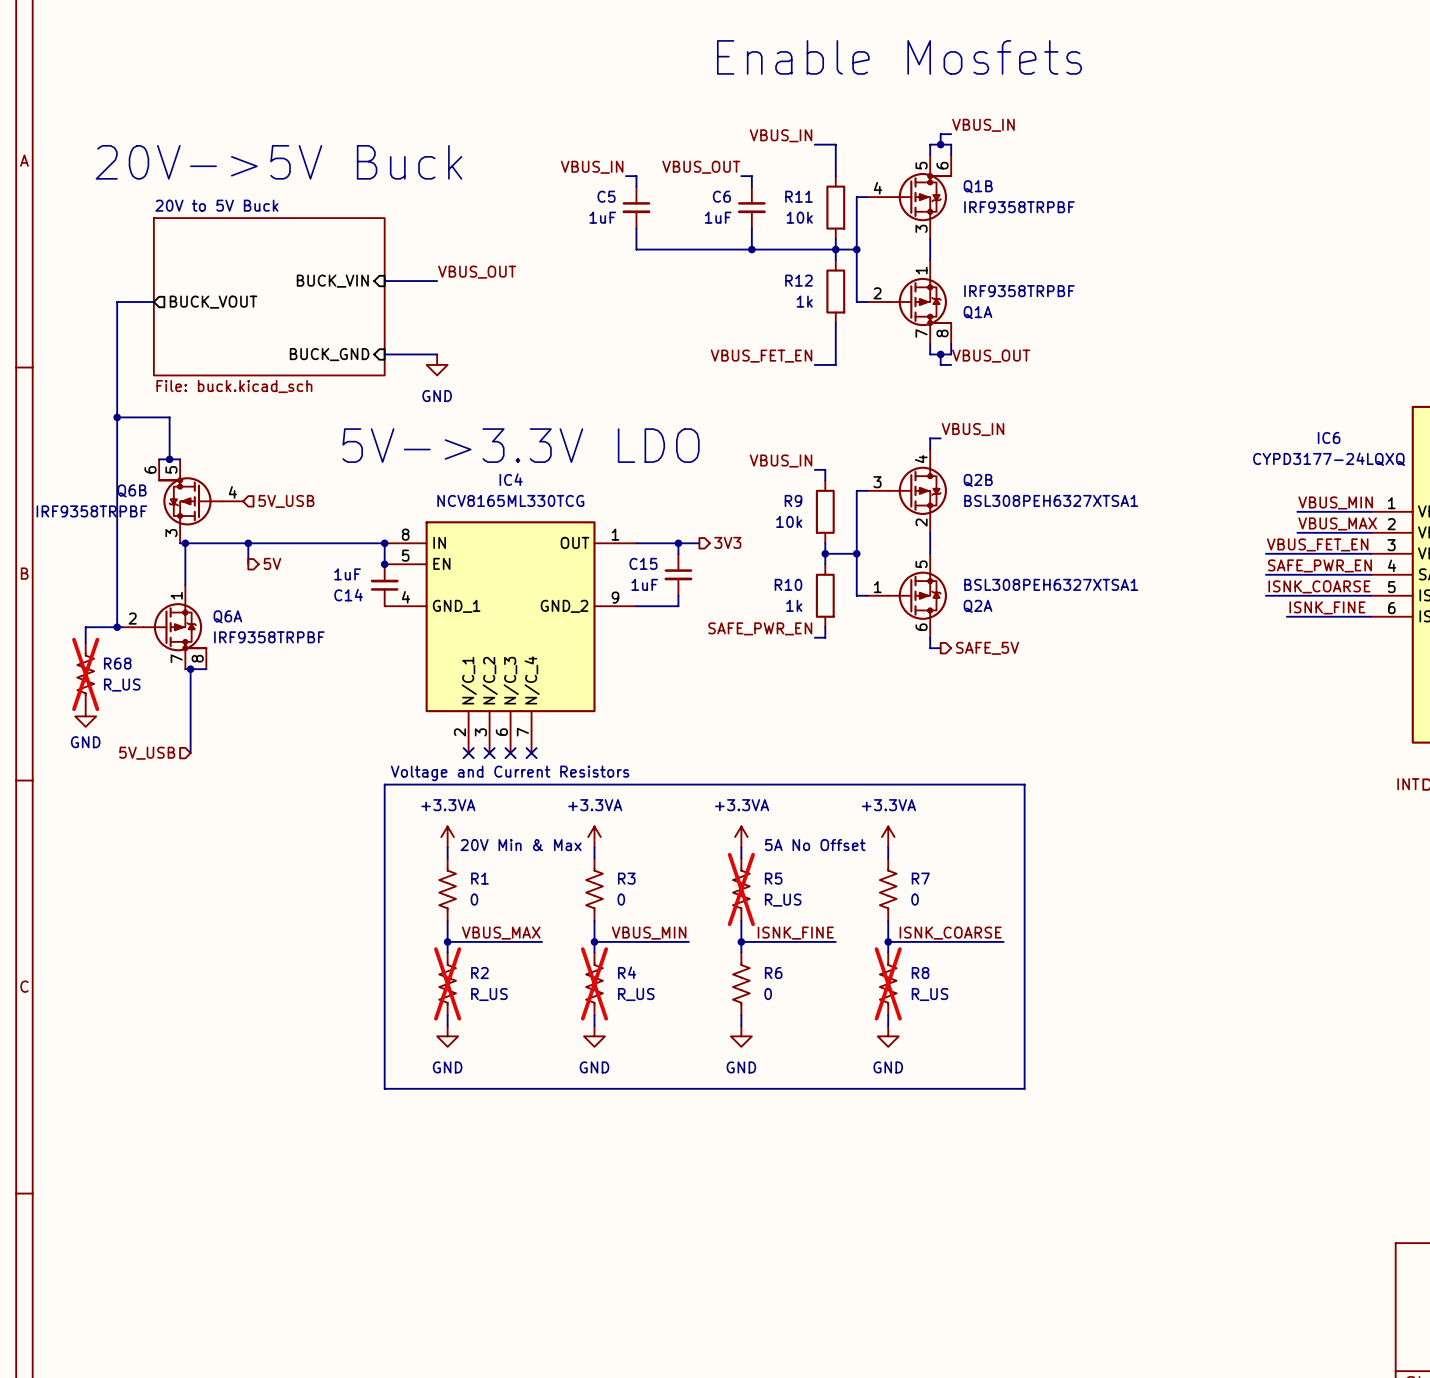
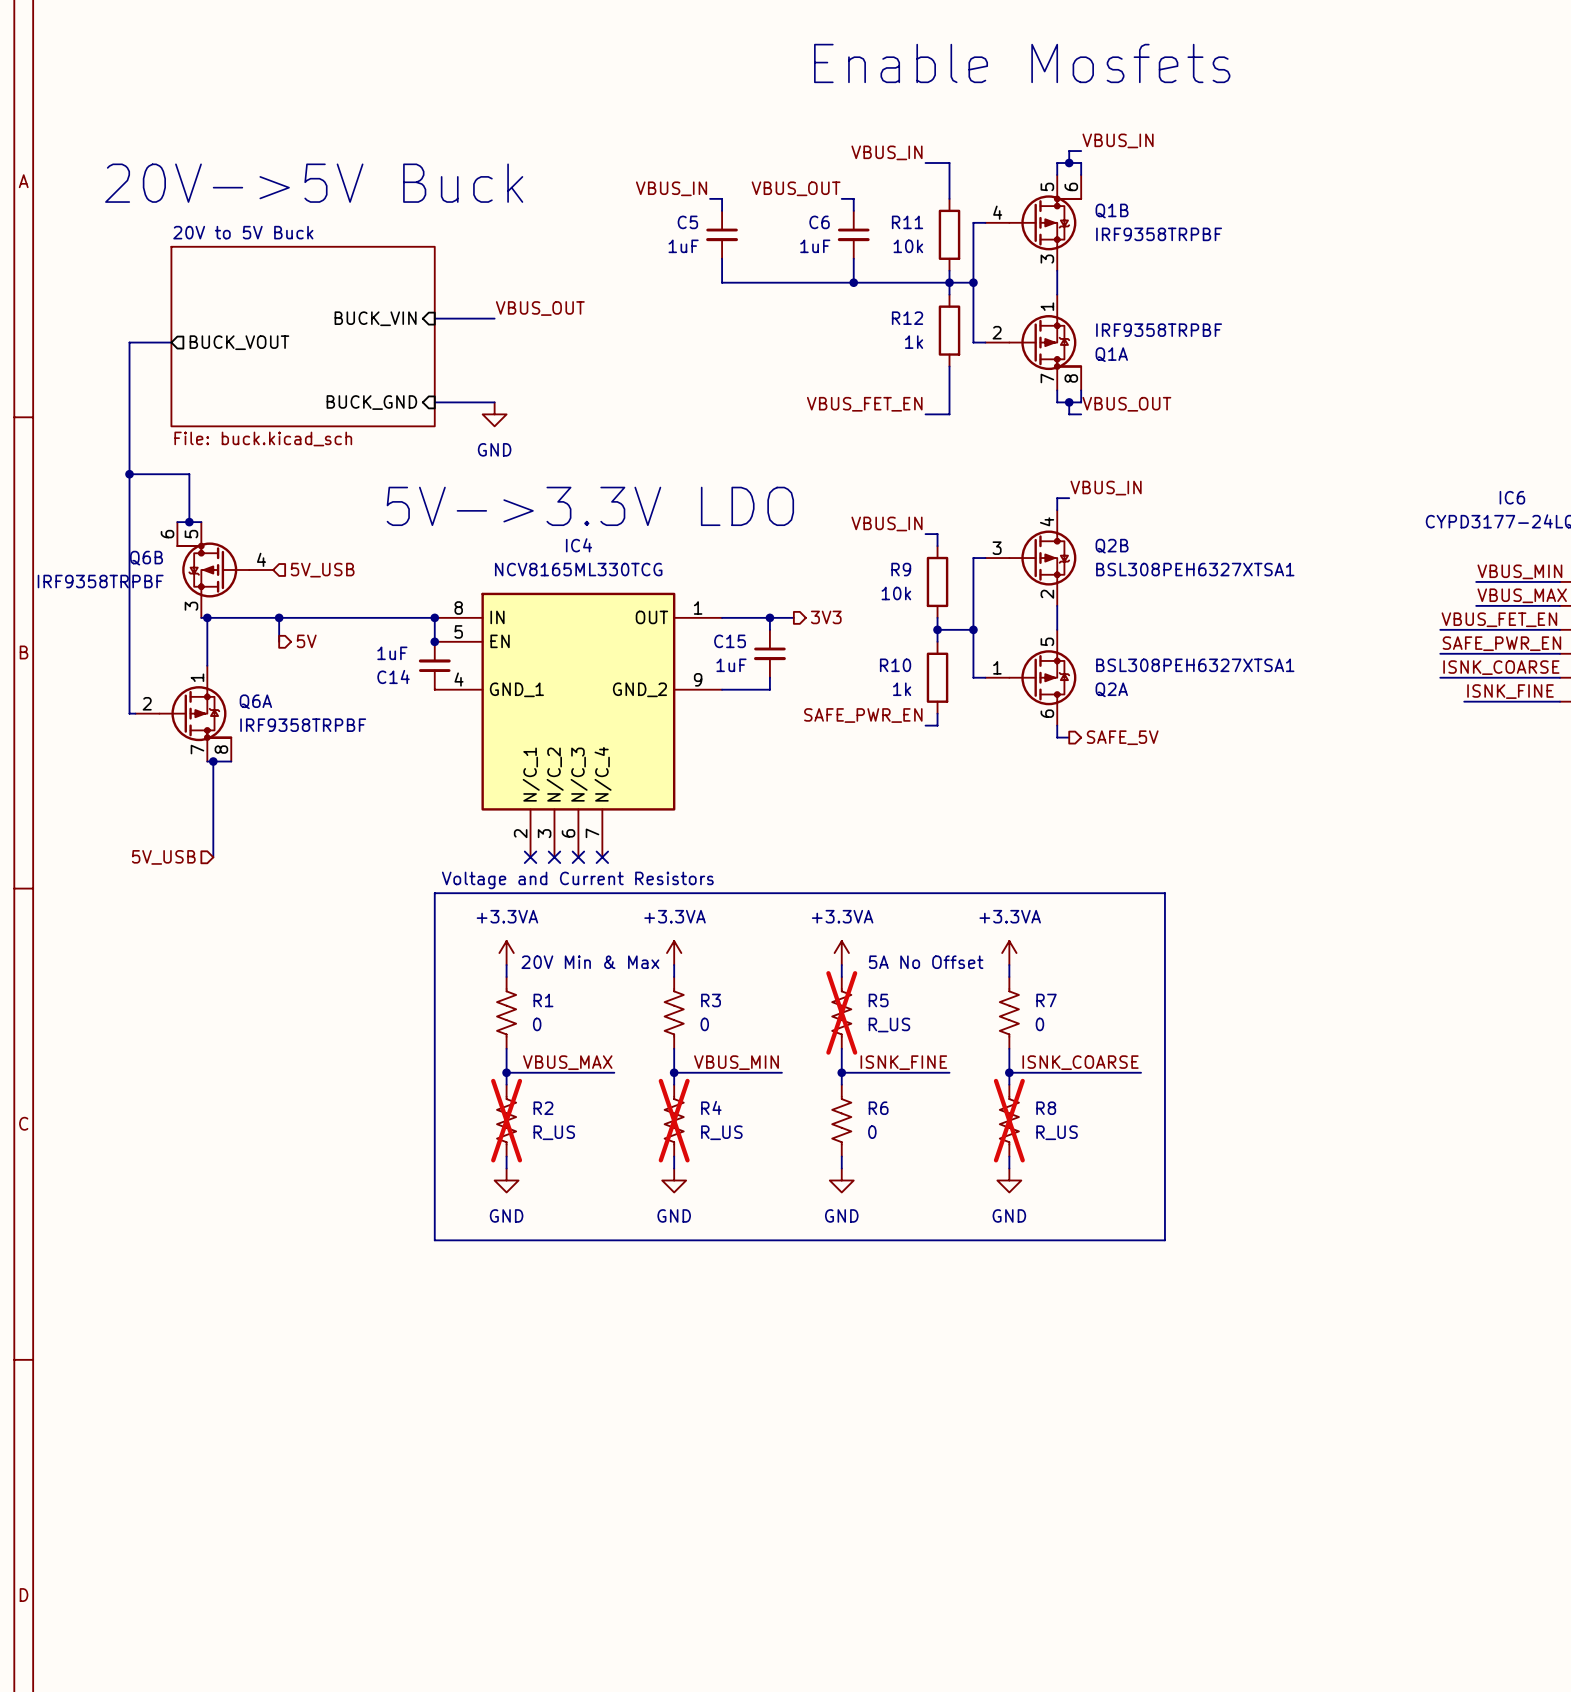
wire: (117, 627) (85, 627) (85, 642) -> none
junction: (117, 627) -> none
R68: R_US (85, 674) -> none
power symbol: GND (85, 716) -> none

